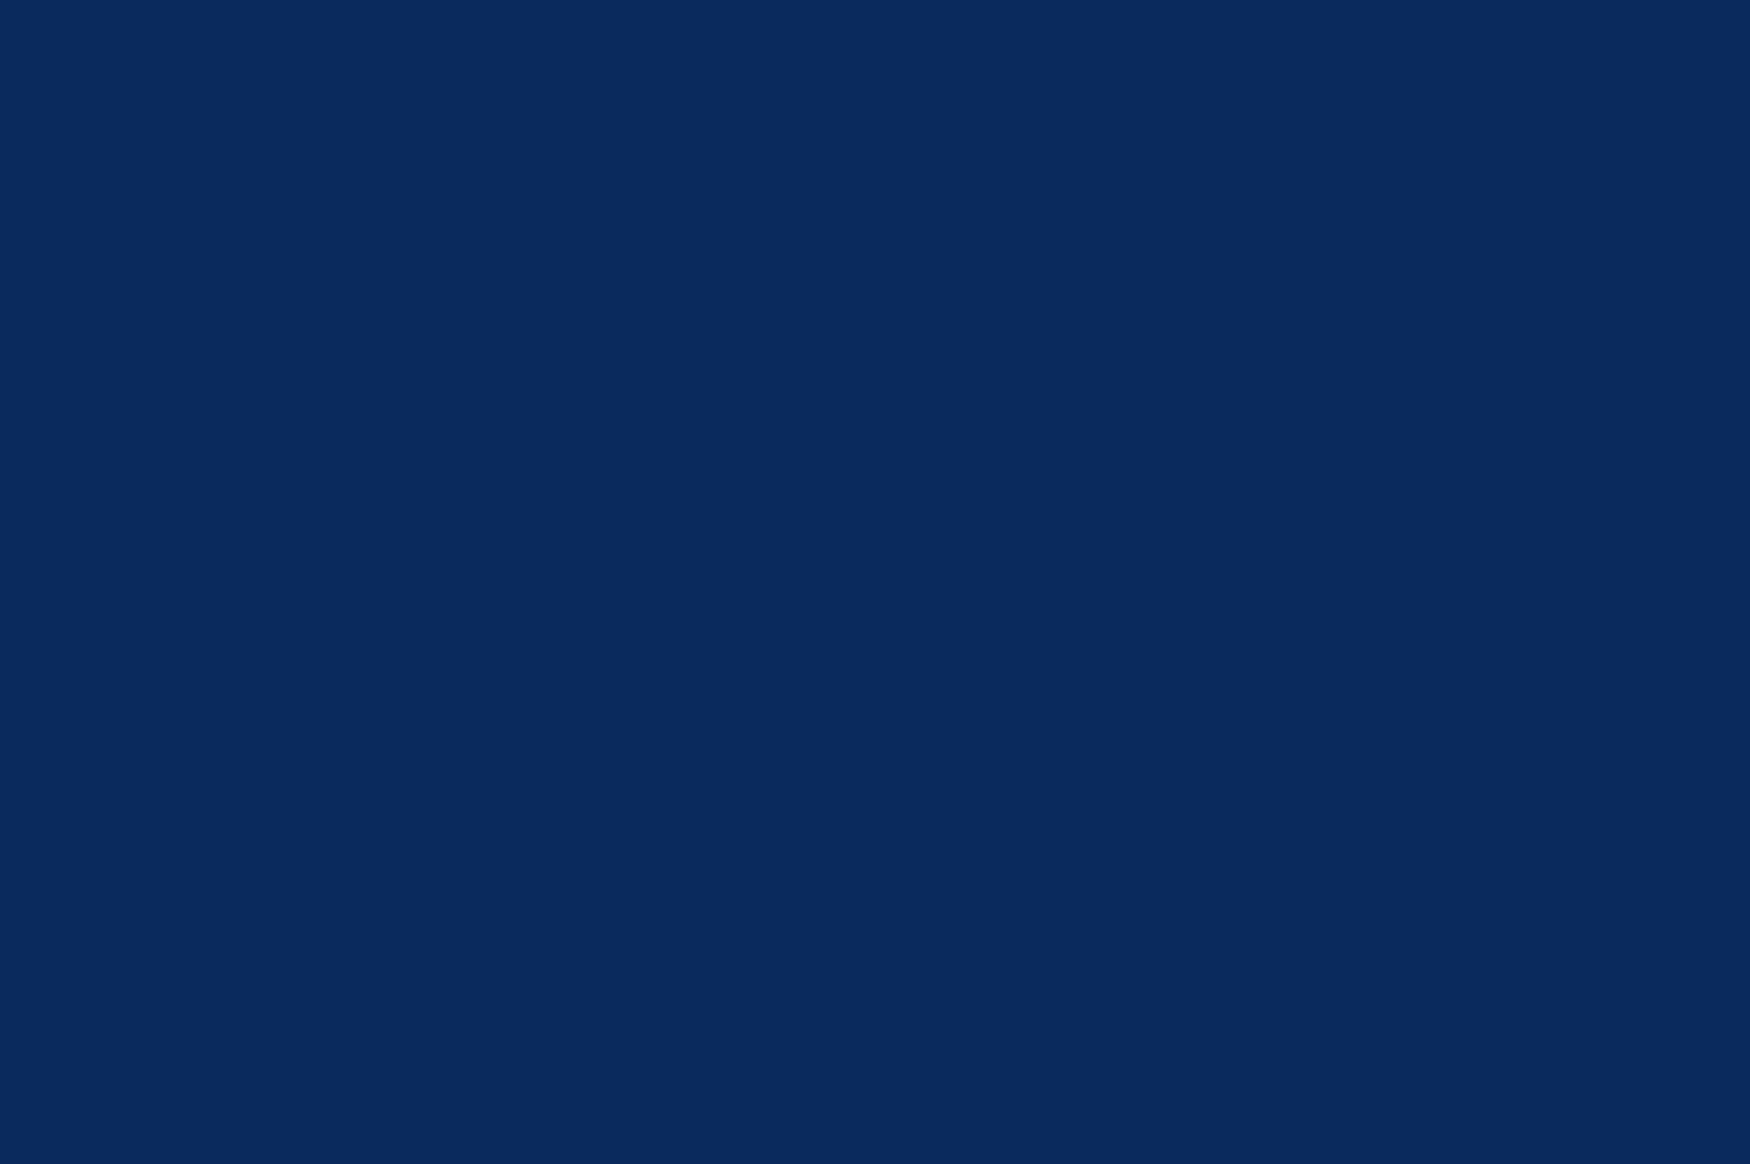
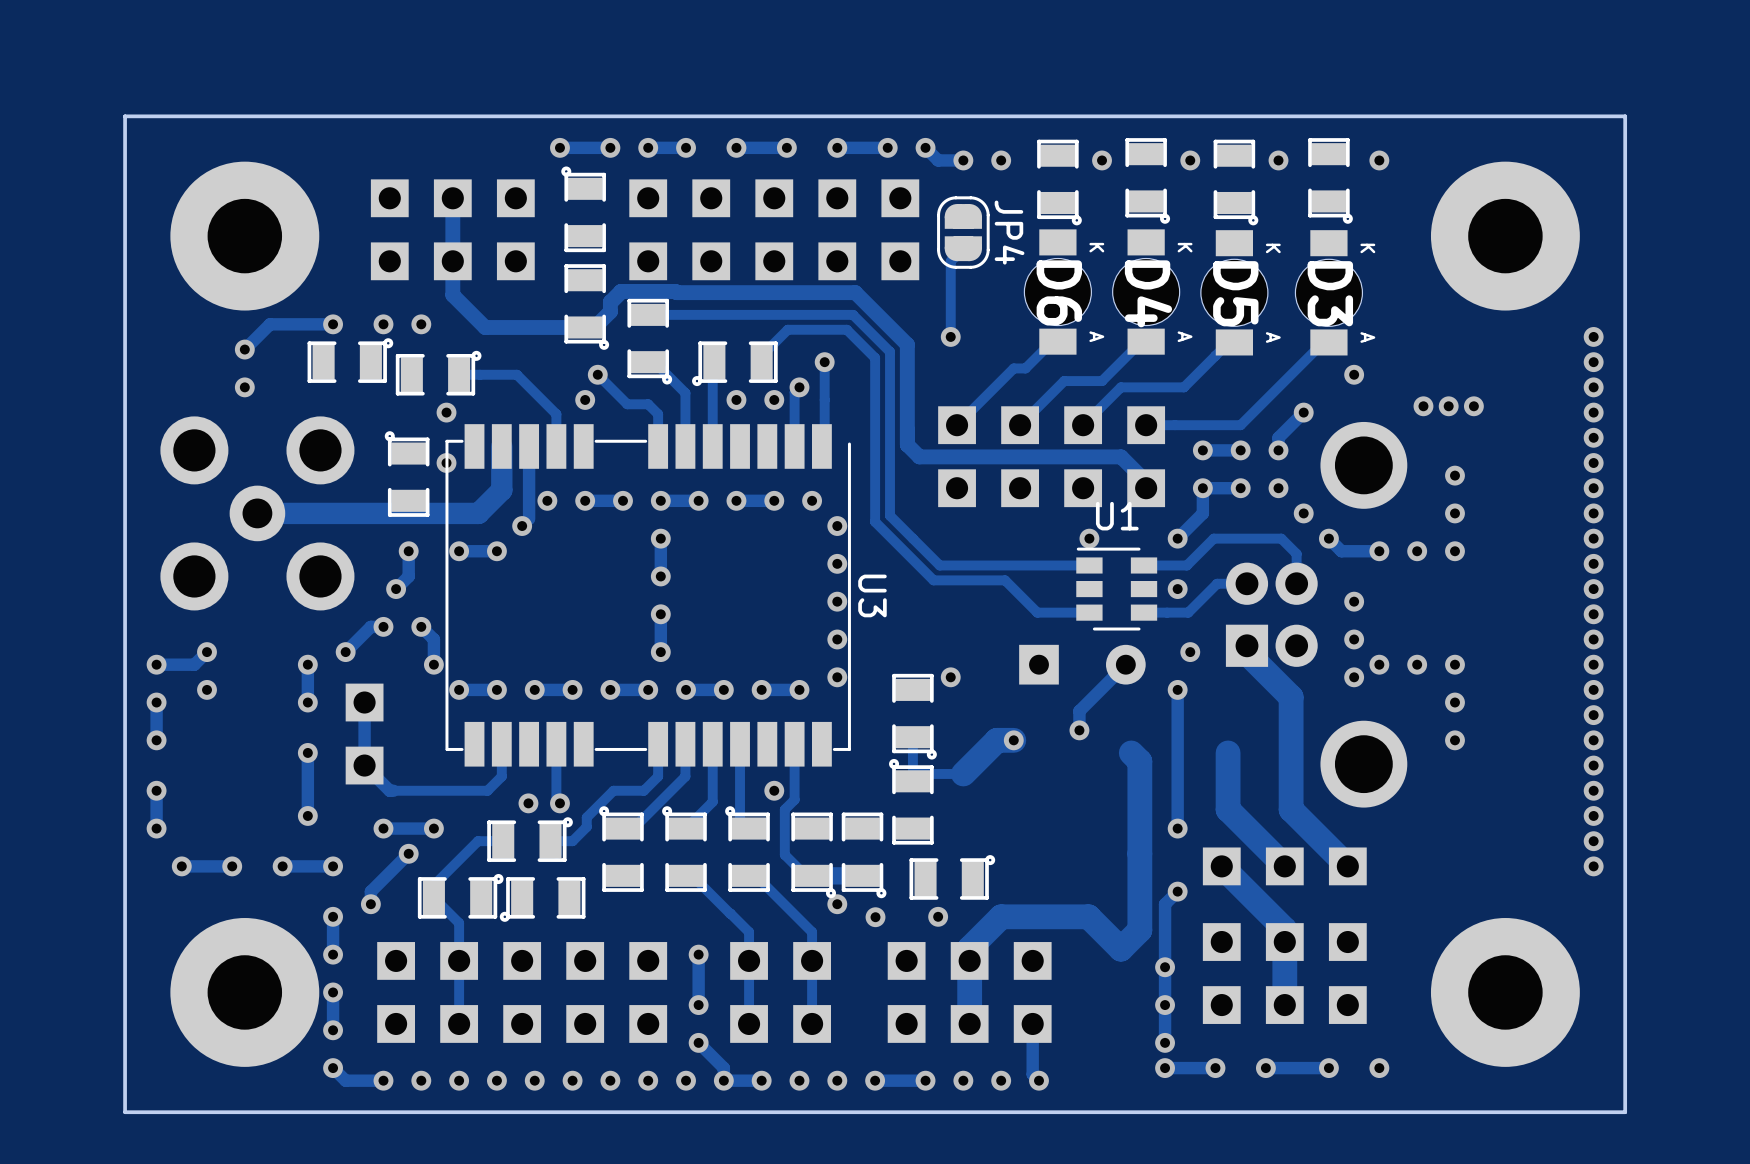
board edge: none -> (1625, 116) (125, 116) (125, 1112) (1625, 1112) (1625, 116)
via: none -> (559, 147)
track: none -> (610, 147) (559, 147)
via: none -> (610, 147)
via: none -> (648, 147)
track: none -> (686, 147) (648, 147)
via: none -> (686, 147)
via: none -> (736, 147)
track: none -> (786, 147) (736, 147)
via: none -> (786, 147)
via: none -> (837, 147)
track: none -> (887, 147) (837, 147)
via: none -> (887, 147)
track: none -> (925, 147) (938, 160) (963, 160)
via: none -> (925, 147)
via: none -> (963, 160)
via: none -> (1001, 160)
via: none -> (1102, 160)
via: none -> (1190, 160)
via: none -> (1278, 160)
via: none -> (1379, 160)
part: none -> (1147, 180)
part: none -> (1330, 180)
part: none -> (1059, 182)
part: none -> (1235, 182)
track: none -> (452, 198) (452, 295) (485, 327) (594, 327) (610, 311)
part: none -> (583, 209)
part: none -> (452, 229)
part: none -> (648, 229)
part: none -> (711, 229)
part: none -> (774, 229)
part: none -> (837, 229)
part: none -> (900, 229)
JP4: none -> (963, 232)
part: none -> (244, 236)
part: none -> (1505, 236)
track: none -> (963, 248) (950, 261) (950, 336)
D6: none -> (1057, 292)
D4: none -> (1146, 292)
D5: none -> (1234, 292)
D3: none -> (1328, 292)
part: none -> (586, 307)
track: none -> (610, 311) (610, 302) (620, 291) (855, 292) (907, 344) (907, 444) (919, 456) (1121, 456) (1146, 481) (1146, 488)
track: none -> (660, 314) (853, 314) (890, 351) (890, 515) (939, 565) (1089, 565)
track: none -> (333, 324) (270, 324) (244, 349)
via: none -> (333, 324)
via: none -> (383, 324)
via: none -> (421, 324)
via: none -> (950, 336)
via: none -> (1593, 336)
part: none -> (649, 341)
track: none -> (1057, 341) (1052, 341) (1025, 368) (1013, 368) (957, 425)
track: none -> (1146, 341) (1141, 341) (1102, 381) (1064, 381) (1020, 425)
track: none -> (1234, 342) (1228, 342) (1183, 387) (1120, 387) (1083, 425)
track: none -> (1328, 342) (1323, 342) (1240, 425) (1146, 425)
via: none -> (244, 349)
part: none -> (350, 360)
track: none -> (648, 362) (654, 362) (685, 393) (685, 446)
track: none -> (714, 362) (712, 363) (712, 446)
track: none -> (761, 362) (761, 355) (787, 329) (846, 329) (875, 358) (875, 521) (933, 580) (1005, 580) (1037, 612) (1089, 612)
track: none -> (824, 362) (824, 443) (821, 446)
via: none -> (824, 362)
via: none -> (1593, 362)
part: none -> (734, 363)
part: none -> (438, 373)
track: none -> (459, 374) (516, 374) (556, 414) (556, 446)
track: none -> (597, 374) (627, 404) (648, 404) (658, 414) (658, 446)
via: none -> (597, 374)
via: none -> (1354, 374)
via: none -> (244, 387)
track: none -> (799, 387) (794, 392) (794, 446)
via: none -> (799, 387)
via: none -> (1593, 387)
via: none -> (585, 399)
via: none -> (736, 399)
via: none -> (774, 399)
via: none -> (1423, 406)
via: none -> (1448, 406)
via: none -> (1473, 406)
via: none -> (446, 412)
track: none -> (1303, 412) (1278, 437) (1278, 450)
via: none -> (1303, 412)
via: none -> (1593, 412)
via: none -> (1593, 437)
track: none -> (501, 446) (501, 490) (478, 513) (257, 513)
track: none -> (529, 446) (529, 519)
via: none -> (1202, 450)
track: none -> (1240, 450) (1202, 450)
via: none -> (1240, 450)
via: none -> (1278, 450)
part: none -> (957, 456)
part: none -> (1020, 456)
part: none -> (1083, 456)
part: none -> (1146, 456)
via: none -> (446, 463)
via: none -> (1593, 463)
part: none -> (407, 474)
via: none -> (1454, 475)
via: none -> (1202, 488)
track: none -> (1240, 488) (1202, 488) (1202, 513) (1177, 538)
via: none -> (1240, 488)
via: none -> (1278, 488)
via: none -> (1593, 488)
via: none -> (547, 500)
via: none -> (585, 500)
track: none -> (623, 500) (585, 500)
via: none -> (623, 500)
via: none -> (660, 500)
track: none -> (698, 500) (660, 500)
via: none -> (698, 500)
via: none -> (736, 500)
track: none -> (774, 500) (736, 500)
via: none -> (774, 500)
via: none -> (812, 500)
part: none -> (257, 513)
via: none -> (1303, 513)
via: none -> (1454, 513)
via: none -> (1593, 513)
via: none -> (522, 526)
via: none -> (837, 526)
track: none -> (660, 538) (660, 576)
via: none -> (660, 538)
via: none -> (1089, 538)
via: none -> (1177, 538)
track: none -> (1328, 538) (1341, 551) (1379, 551)
via: none -> (1328, 538)
via: none -> (1593, 538)
track: none -> (408, 551) (408, 576) (396, 589)
via: none -> (408, 551)
via: none -> (459, 551)
track: none -> (496, 551) (459, 551)
via: none -> (496, 551)
via: none -> (1379, 551)
via: none -> (1417, 551)
via: none -> (1454, 551)
via: none -> (837, 563)
via: none -> (1593, 563)
track: none -> (1144, 565) (1186, 565) (1213, 538) (1281, 538) (1296, 553) (1296, 583)
via: none -> (660, 576)
track: none -> (1246, 583) (1217, 583) (1188, 612) (1144, 612)
via: none -> (396, 589)
U1: none -> (1116, 589)
via: none -> (1177, 589)
via: none -> (1593, 589)
U3: none -> (648, 595)
via: none -> (837, 601)
via: none -> (1354, 601)
track: none -> (660, 614) (660, 652)
via: none -> (660, 614)
part: none -> (1316, 614)
via: none -> (1593, 614)
track: none -> (383, 626) (370, 626) (345, 652)
via: none -> (383, 626)
track: none -> (421, 626) (433, 639) (433, 664)
via: none -> (421, 626)
via: none -> (837, 639)
via: none -> (1354, 639)
via: none -> (1593, 639)
track: none -> (1246, 645) (1246, 653) (1291, 697) (1291, 809) (1347, 866)
track: none -> (207, 652) (194, 664) (156, 664)
via: none -> (207, 652)
via: none -> (345, 652)
via: none -> (660, 652)
via: none -> (1190, 652)
via: none -> (156, 664)
track: none -> (307, 664) (307, 702)
via: none -> (307, 664)
via: none -> (433, 664)
part: none -> (1082, 664)
track: none -> (1125, 664) (1079, 711) (1079, 730)
via: none -> (1379, 664)
via: none -> (1417, 664)
via: none -> (1454, 664)
via: none -> (1593, 664)
via: none -> (837, 677)
via: none -> (950, 677)
via: none -> (1354, 677)
via: none -> (207, 689)
via: none -> (459, 689)
track: none -> (496, 689) (459, 689)
via: none -> (496, 689)
via: none -> (534, 689)
track: none -> (572, 689) (534, 689)
via: none -> (572, 689)
via: none -> (610, 689)
track: none -> (648, 689) (610, 689)
via: none -> (648, 689)
via: none -> (686, 689)
track: none -> (723, 689) (686, 689)
via: none -> (723, 689)
via: none -> (761, 689)
track: none -> (799, 689) (761, 689)
via: none -> (799, 689)
track: none -> (1177, 689) (1177, 828)
via: none -> (1177, 689)
via: none -> (1593, 689)
track: none -> (156, 702) (156, 740)
via: none -> (156, 702)
via: none -> (307, 702)
track: none -> (364, 702) (364, 765) (389, 790) (487, 790) (501, 776) (501, 744)
via: none -> (1454, 702)
via: none -> (1593, 715)
part: none -> (914, 716)
via: none -> (1079, 730)
part: none -> (364, 734)
track: none -> (912, 737) (912, 781) (920, 773) (963, 773) (997, 740) (1013, 740)
via: none -> (156, 740)
via: none -> (1013, 740)
via: none -> (1454, 740)
via: none -> (1593, 740)
track: none -> (556, 744) (556, 799) (559, 803)
track: none -> (658, 744) (658, 776) (643, 790) (613, 790) (586, 817) (586, 827) (572, 841) (550, 841)
track: none -> (685, 744) (685, 776) (633, 828) (623, 828)
track: none -> (712, 744) (712, 801) (686, 828)
track: none -> (740, 744) (740, 819) (749, 828)
track: none -> (794, 744) (794, 799) (784, 809) (784, 854) (805, 875) (862, 875)
track: none -> (307, 752) (307, 815)
via: none -> (307, 752)
track: none -> (1131, 752) (1139, 761) (1139, 930) (1120, 949) (1088, 916) (1001, 916) (969, 948) (969, 1023)
track: none -> (1228, 752) (1228, 809) (1284, 866)
via: none -> (1593, 765)
track: none -> (156, 790) (156, 828)
via: none -> (156, 790)
via: none -> (774, 790)
via: none -> (1593, 790)
part: none -> (911, 801)
via: none -> (528, 803)
via: none -> (559, 803)
via: none -> (307, 815)
via: none -> (1593, 815)
via: none -> (156, 828)
via: none -> (383, 828)
track: none -> (433, 828) (383, 828)
via: none -> (433, 828)
via: none -> (1177, 828)
part: none -> (530, 839)
track: none -> (503, 841) (478, 841) (433, 885) (433, 897) (459, 923) (459, 1023)
via: none -> (1593, 841)
part: none -> (621, 849)
part: none -> (684, 849)
part: none -> (747, 849)
track: none -> (408, 853) (370, 891) (370, 904)
via: none -> (408, 853)
part: none -> (813, 855)
part: none -> (864, 855)
via: none -> (181, 866)
track: none -> (232, 866) (181, 866)
via: none -> (232, 866)
via: none -> (282, 866)
track: none -> (333, 866) (282, 866)
via: none -> (333, 866)
track: none -> (1221, 866) (1284, 929) (1284, 1005)
part: none -> (1284, 866)
via: none -> (1593, 866)
track: none -> (686, 875) (692, 875) (730, 913)
track: none -> (749, 875) (755, 875) (812, 932) (812, 1023)
part: none -> (952, 877)
track: none -> (1177, 891) (1165, 904) (1165, 1042)
via: none -> (1177, 891)
part: none -> (460, 896)
part: none -> (542, 899)
via: none -> (370, 904)
via: none -> (837, 904)
track: none -> (730, 913) (749, 932) (749, 1023)
track: none -> (333, 916) (333, 954)
via: none -> (333, 916)
via: none -> (938, 916)
via: none -> (875, 917)
via: none -> (333, 954)
track: none -> (698, 954) (698, 1005)
via: none -> (698, 954)
via: none -> (1165, 967)
part: none -> (1284, 973)
part: none -> (244, 992)
track: none -> (333, 992) (333, 1030)
via: none -> (333, 992)
part: none -> (396, 992)
part: none -> (459, 992)
part: none -> (522, 992)
part: none -> (585, 992)
part: none -> (648, 992)
part: none -> (749, 992)
part: none -> (812, 992)
part: none -> (969, 992)
part: none -> (1505, 992)
via: none -> (698, 1005)
via: none -> (1165, 1005)
track: none -> (1032, 1023) (1032, 1074) (1038, 1080)
via: none -> (333, 1030)
track: none -> (698, 1042) (723, 1068) (723, 1080) (761, 1080)
via: none -> (698, 1042)
via: none -> (1165, 1042)
track: none -> (333, 1068) (345, 1080) (383, 1080)
via: none -> (333, 1068)
via: none -> (1165, 1068)
track: none -> (1215, 1068) (1165, 1068)
via: none -> (1215, 1068)
via: none -> (1265, 1068)
track: none -> (1328, 1068) (1265, 1068)
via: none -> (1328, 1068)
via: none -> (1379, 1068)
via: none -> (383, 1080)
via: none -> (421, 1080)
via: none -> (459, 1080)
via: none -> (496, 1080)
via: none -> (534, 1080)
via: none -> (572, 1080)
via: none -> (610, 1080)
via: none -> (648, 1080)
via: none -> (686, 1080)
via: none -> (723, 1080)
via: none -> (761, 1080)
via: none -> (799, 1080)
via: none -> (837, 1080)
via: none -> (875, 1080)
track: none -> (925, 1080) (875, 1080)
via: none -> (925, 1080)
via: none -> (963, 1080)
via: none -> (1001, 1080)
via: none -> (1038, 1080)

